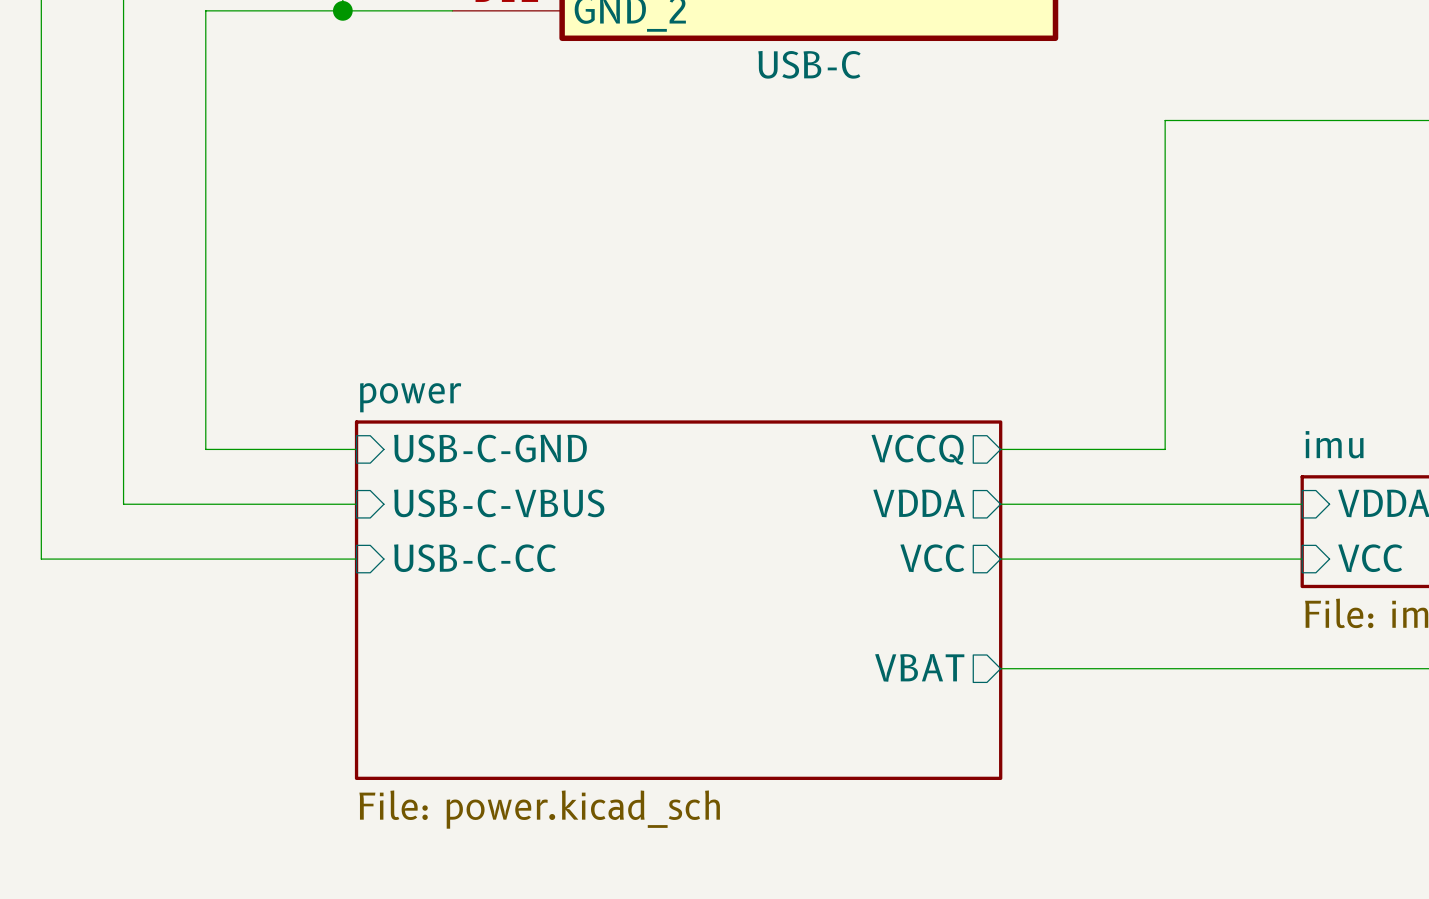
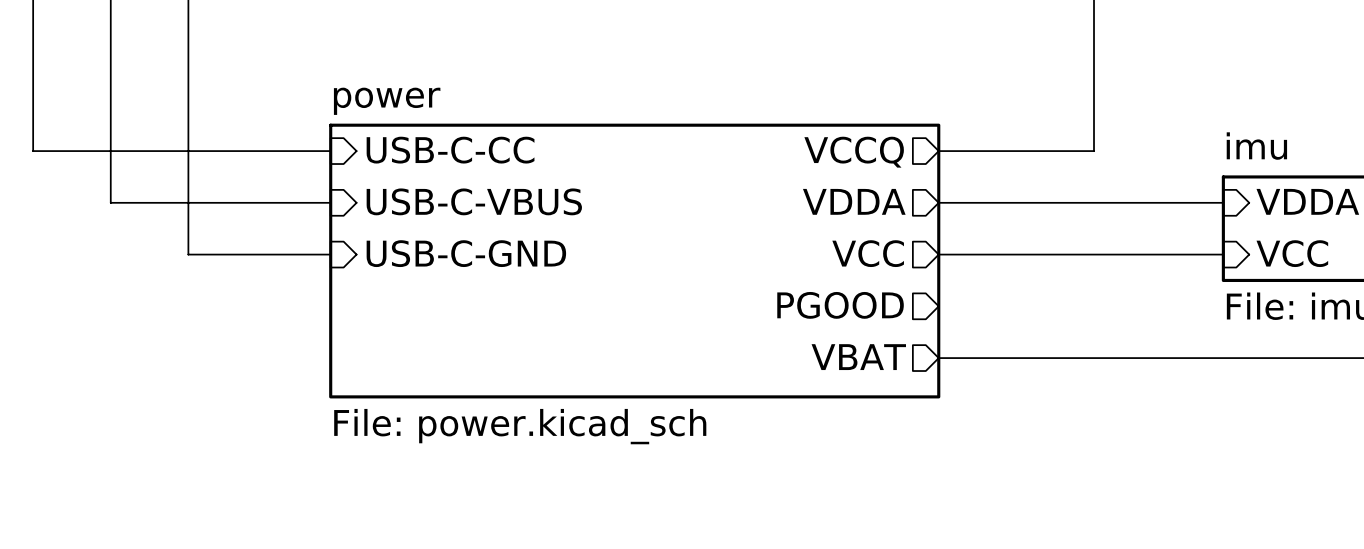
sheet pin: USB-C-GND (490, 448) -> USB-C-CC (450, 150)
wire: (41, 449) (41, 559) (205, 559) -> (33, 151) (188, 151) (188, 254)
sheet pin: USB-C-CC (474, 558) -> USB-C-GND (466, 253)
sheet power: none -> File: power.kicad_sch (634, 261)
sheet power: File: power.kicad_sch (678, 600) -> none
sheet pin: none -> PGOOD (840, 305)

